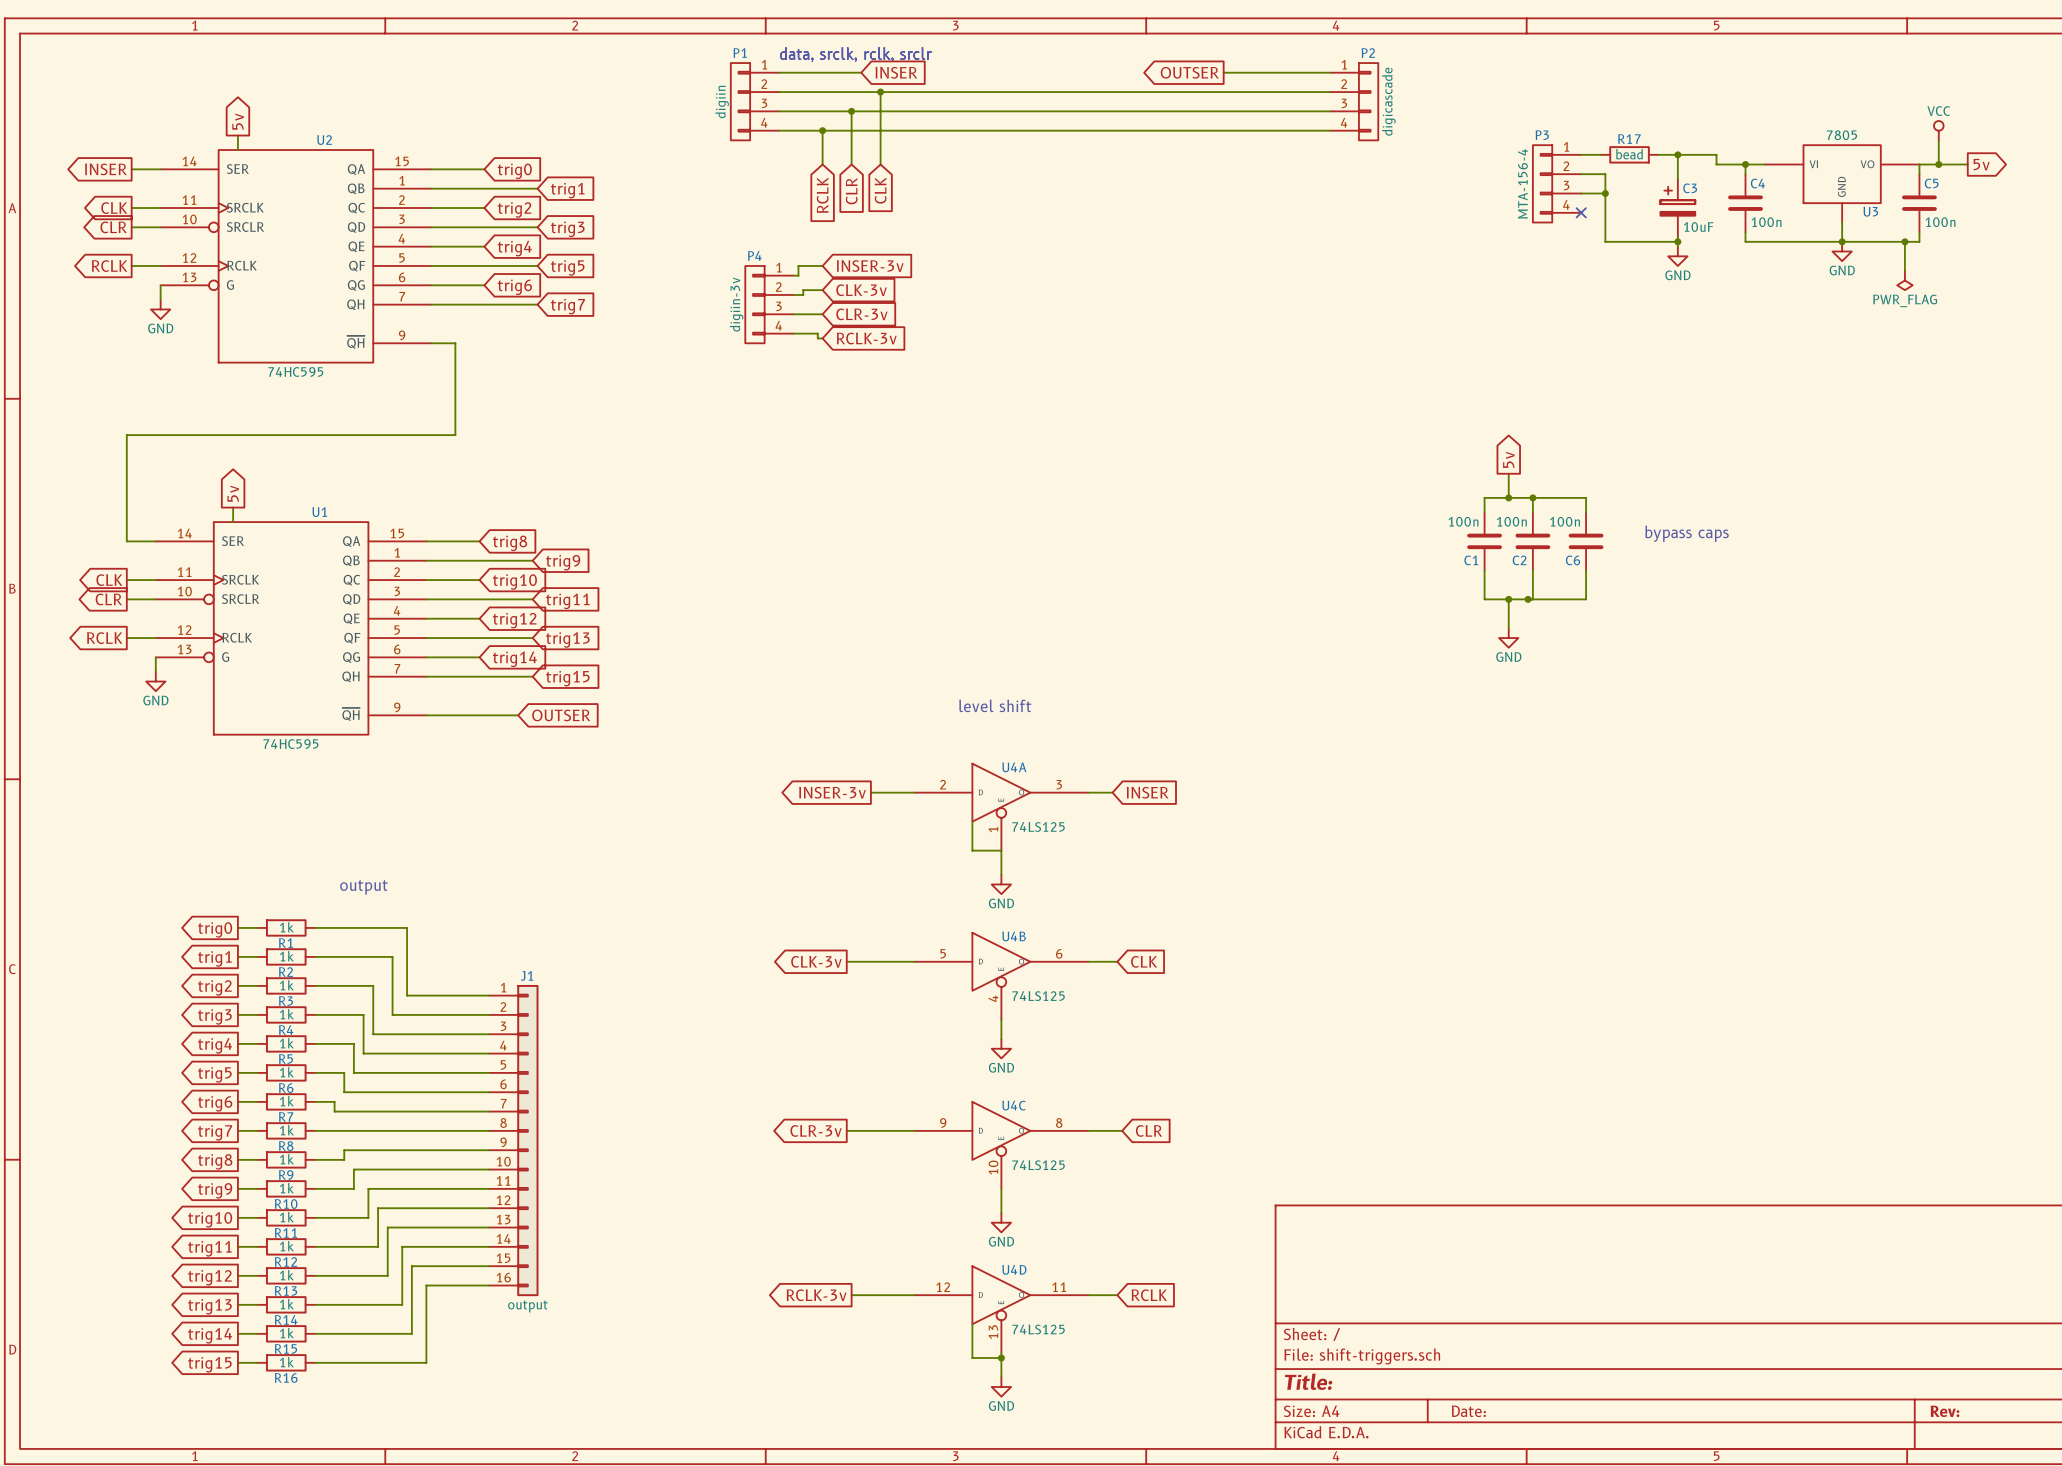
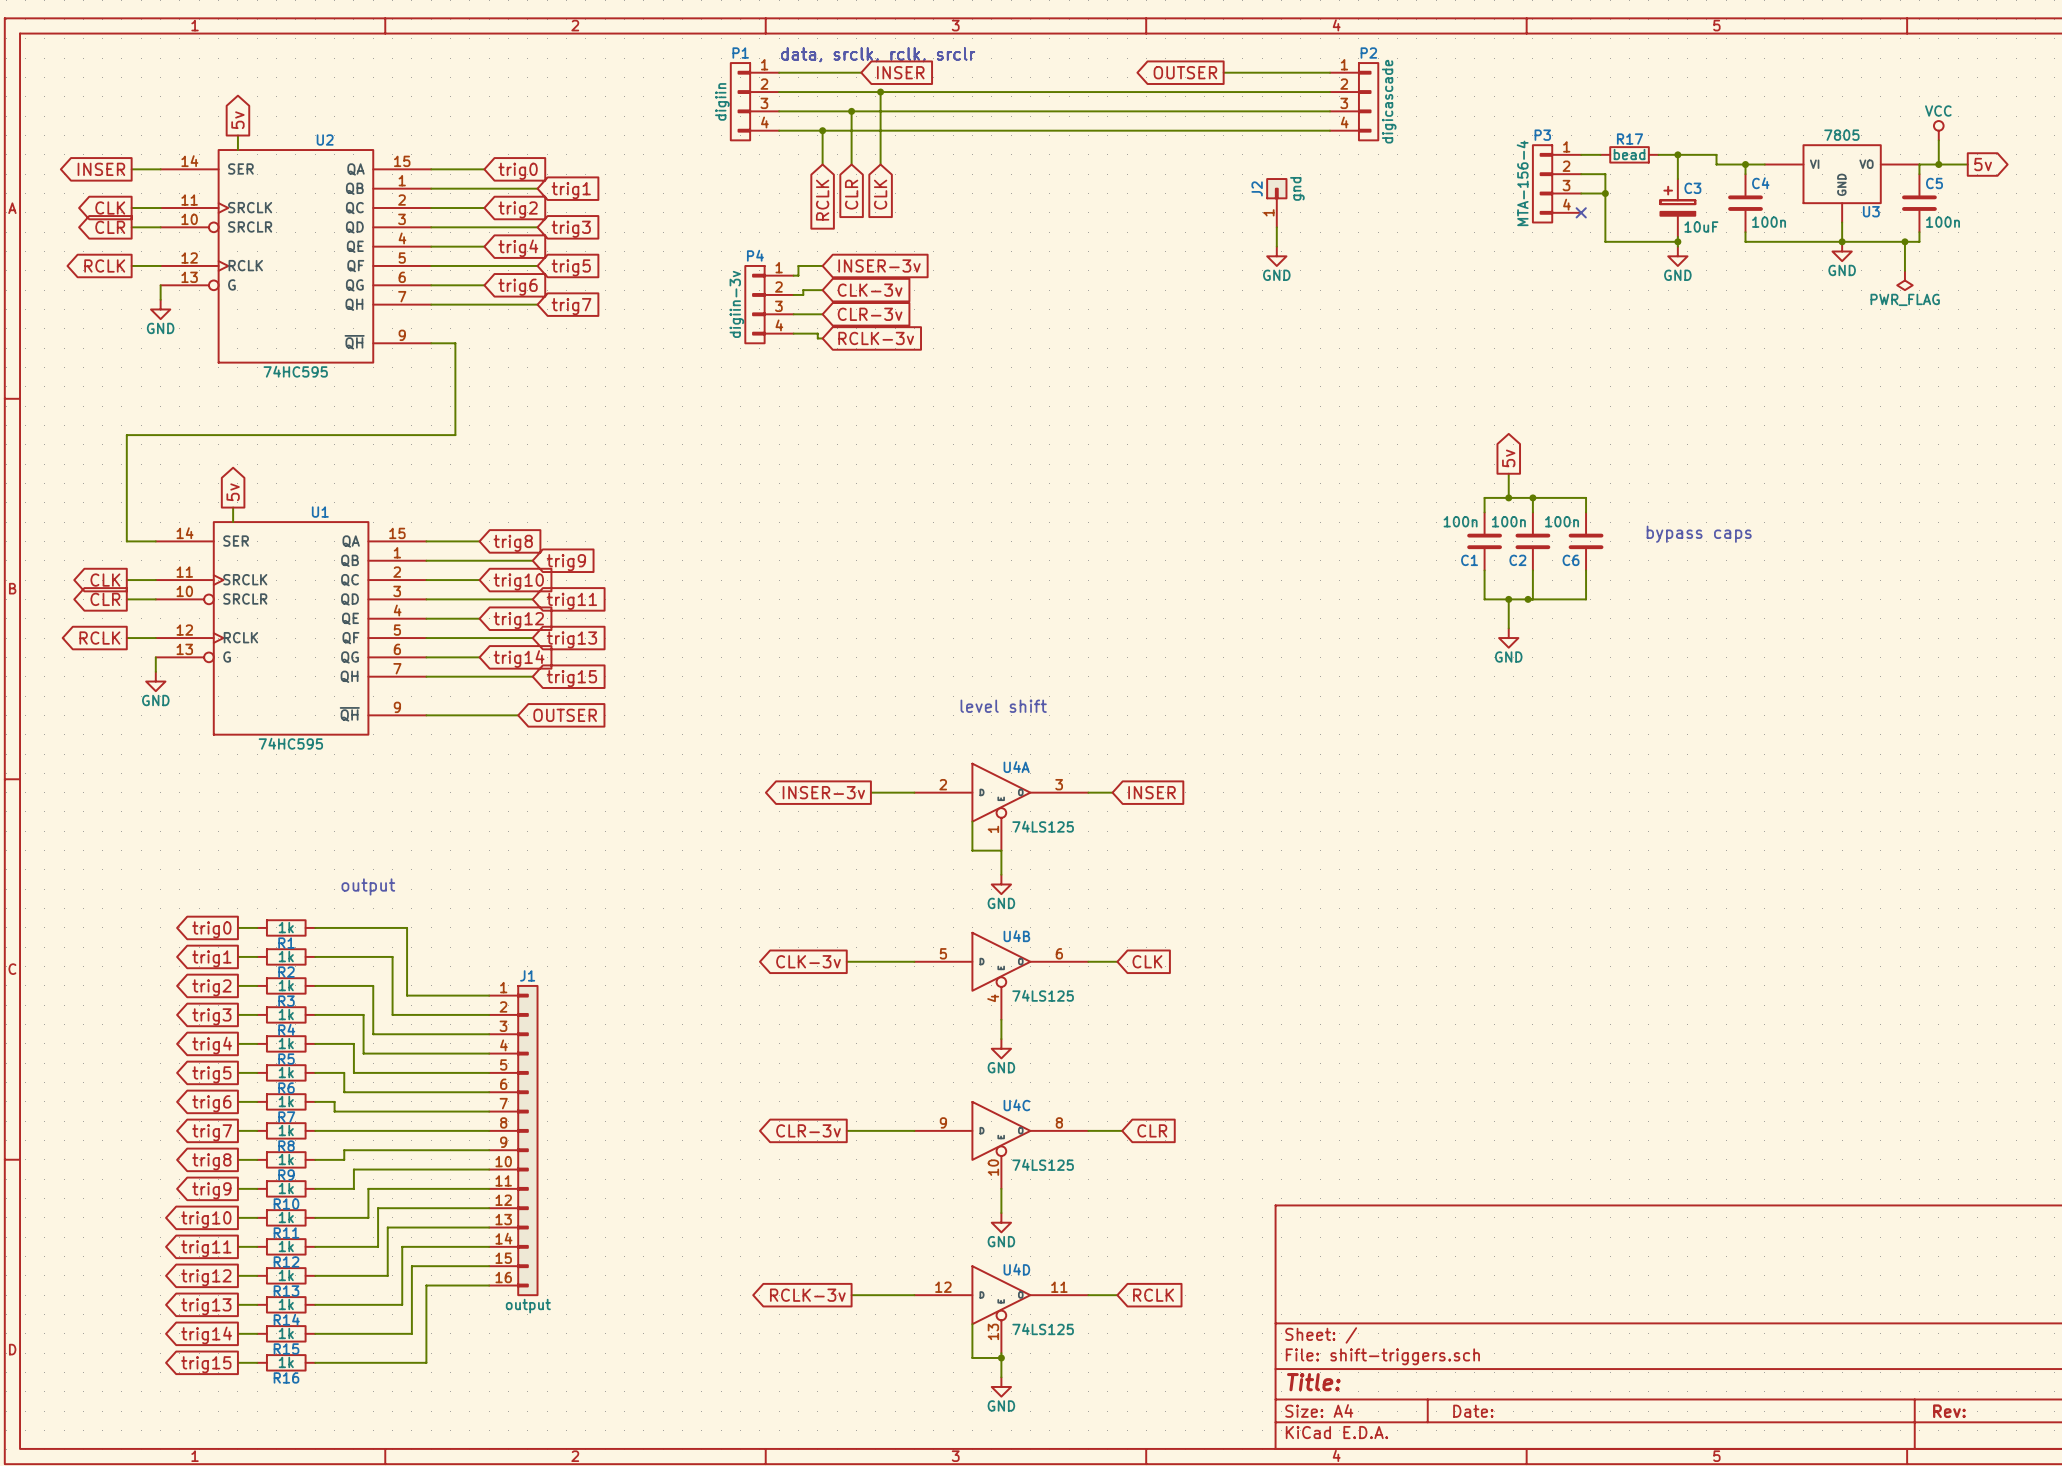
J2: none -> gnd (1276, 202)
wire: none -> (1276, 227) (1276, 246)
power symbol: none -> GND (1276, 256)

